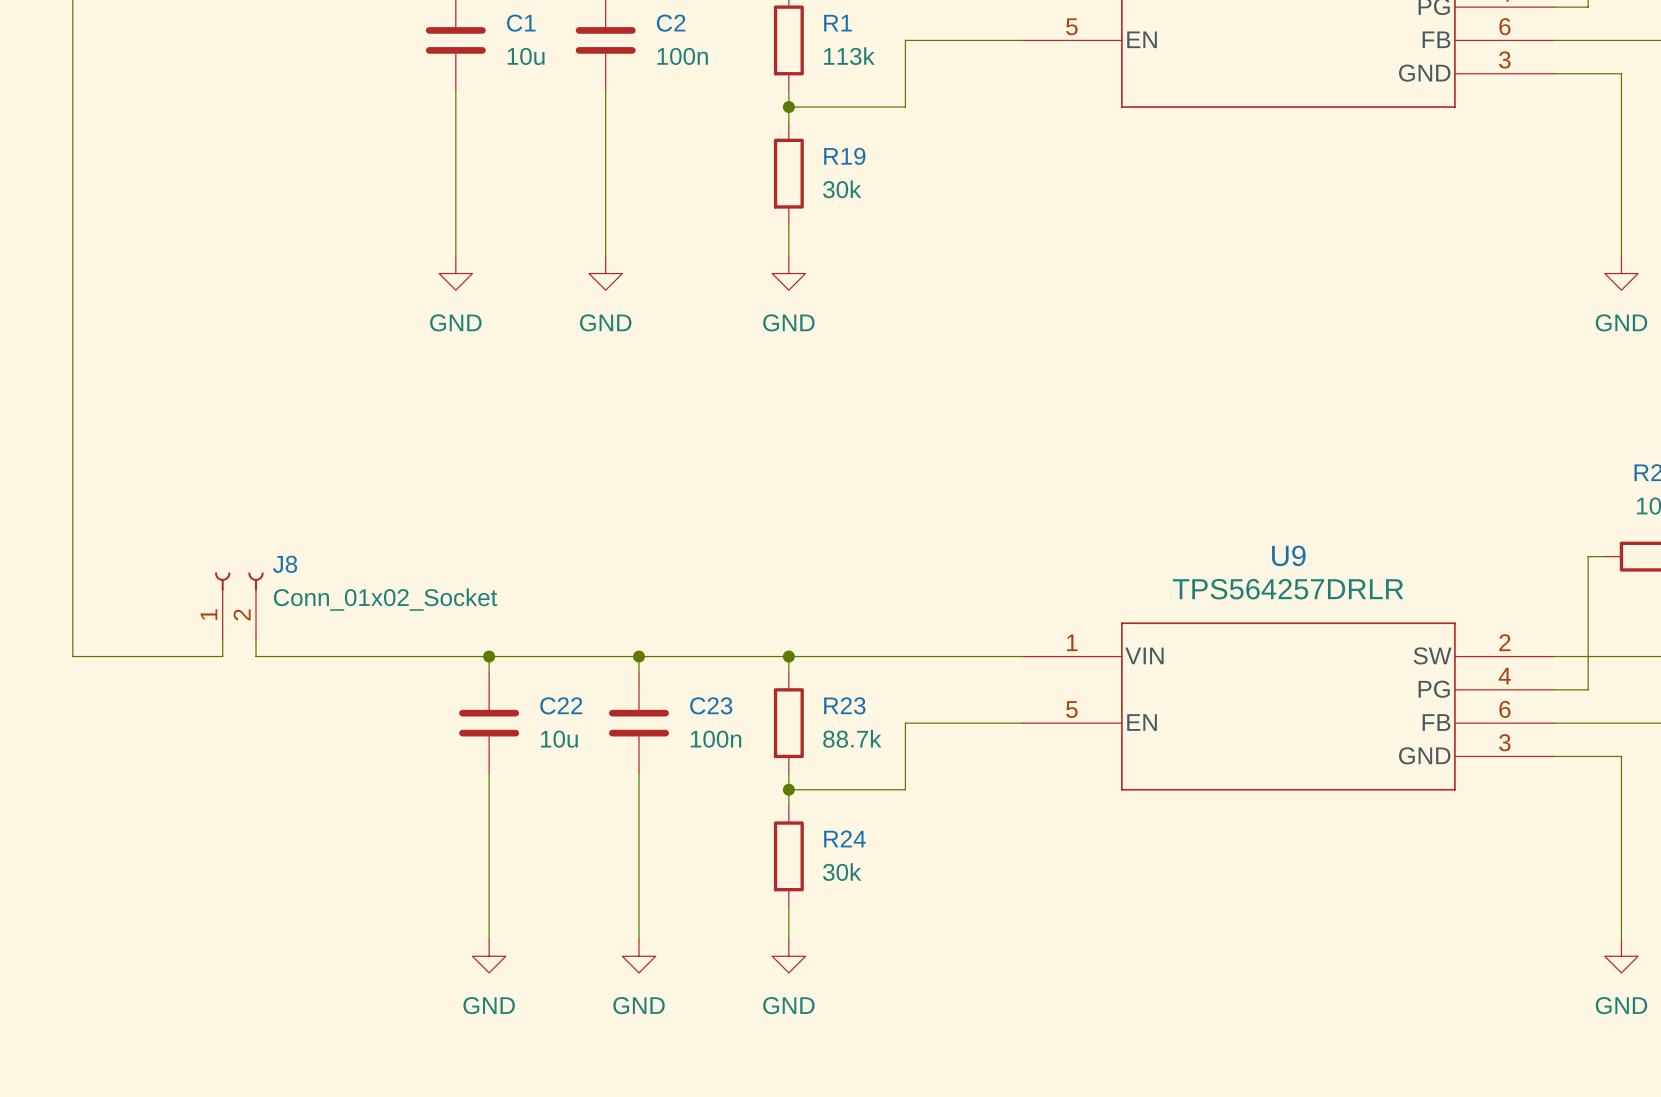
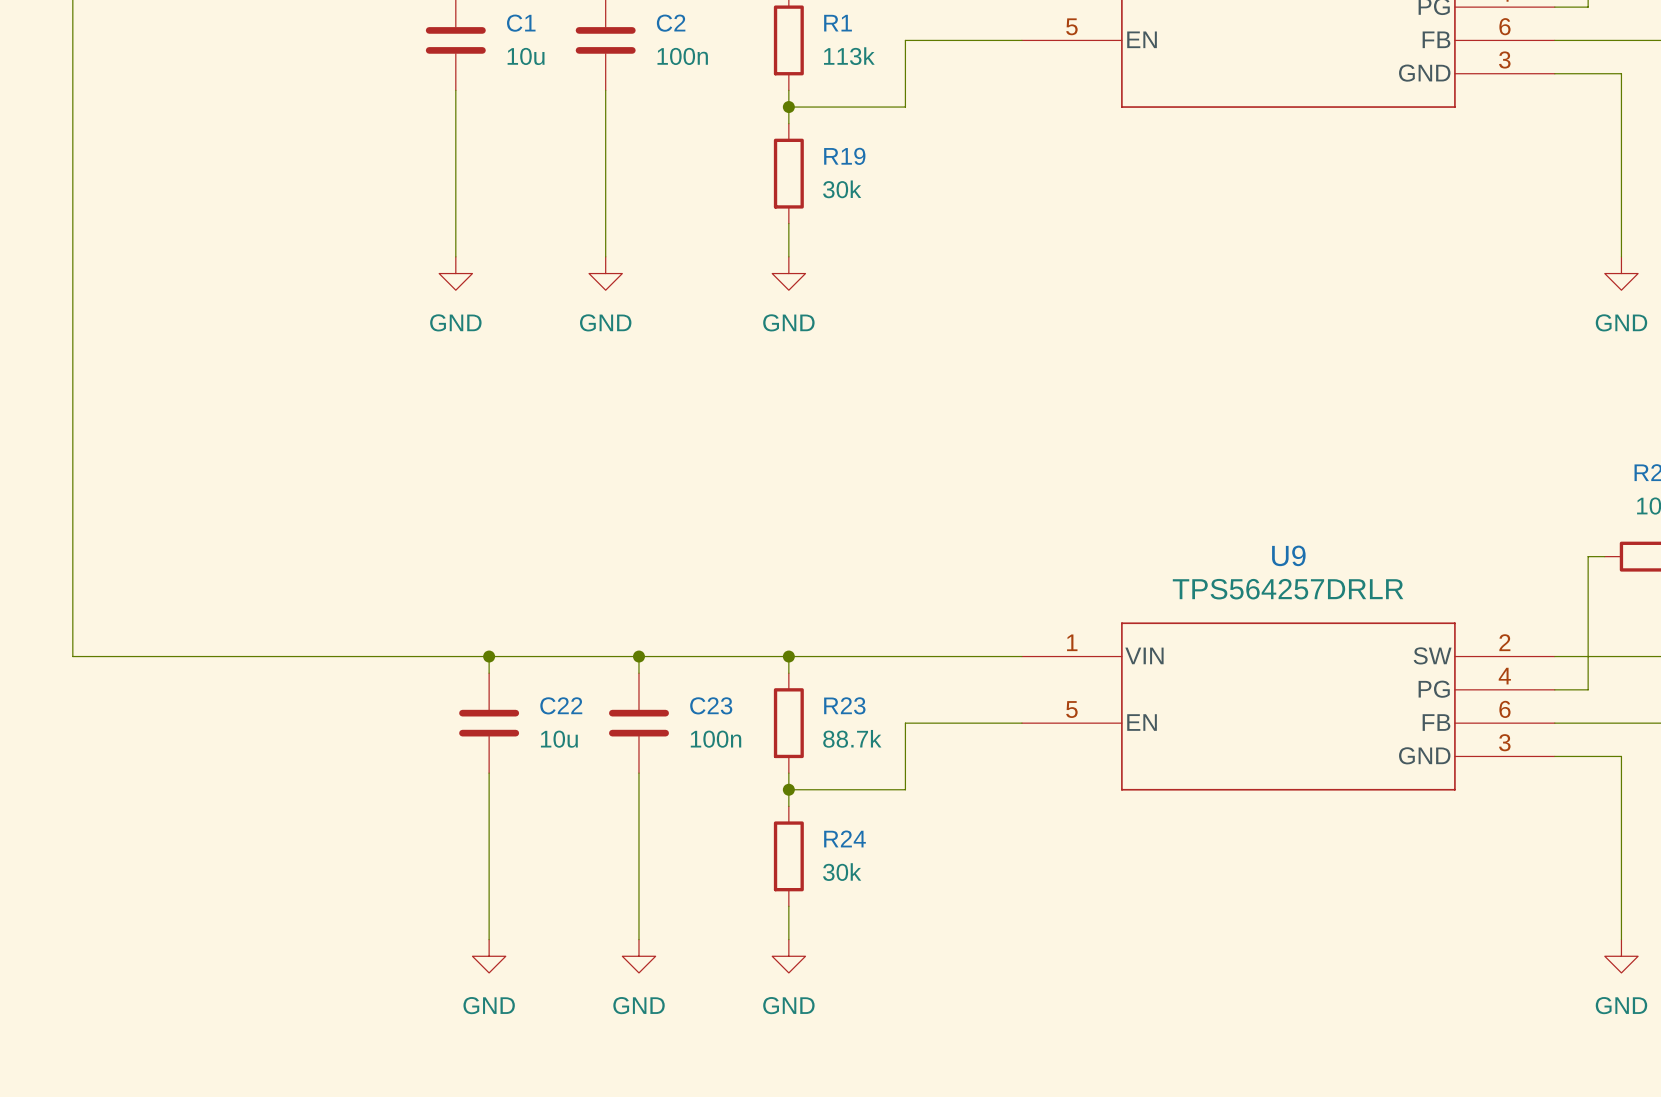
J8: Conn_01x02_Socket (239, 606) -> none
wire: (222, 639) (222, 656) -> (255, 656) (222, 656)
wire: (255, 639) (255, 656) -> none

